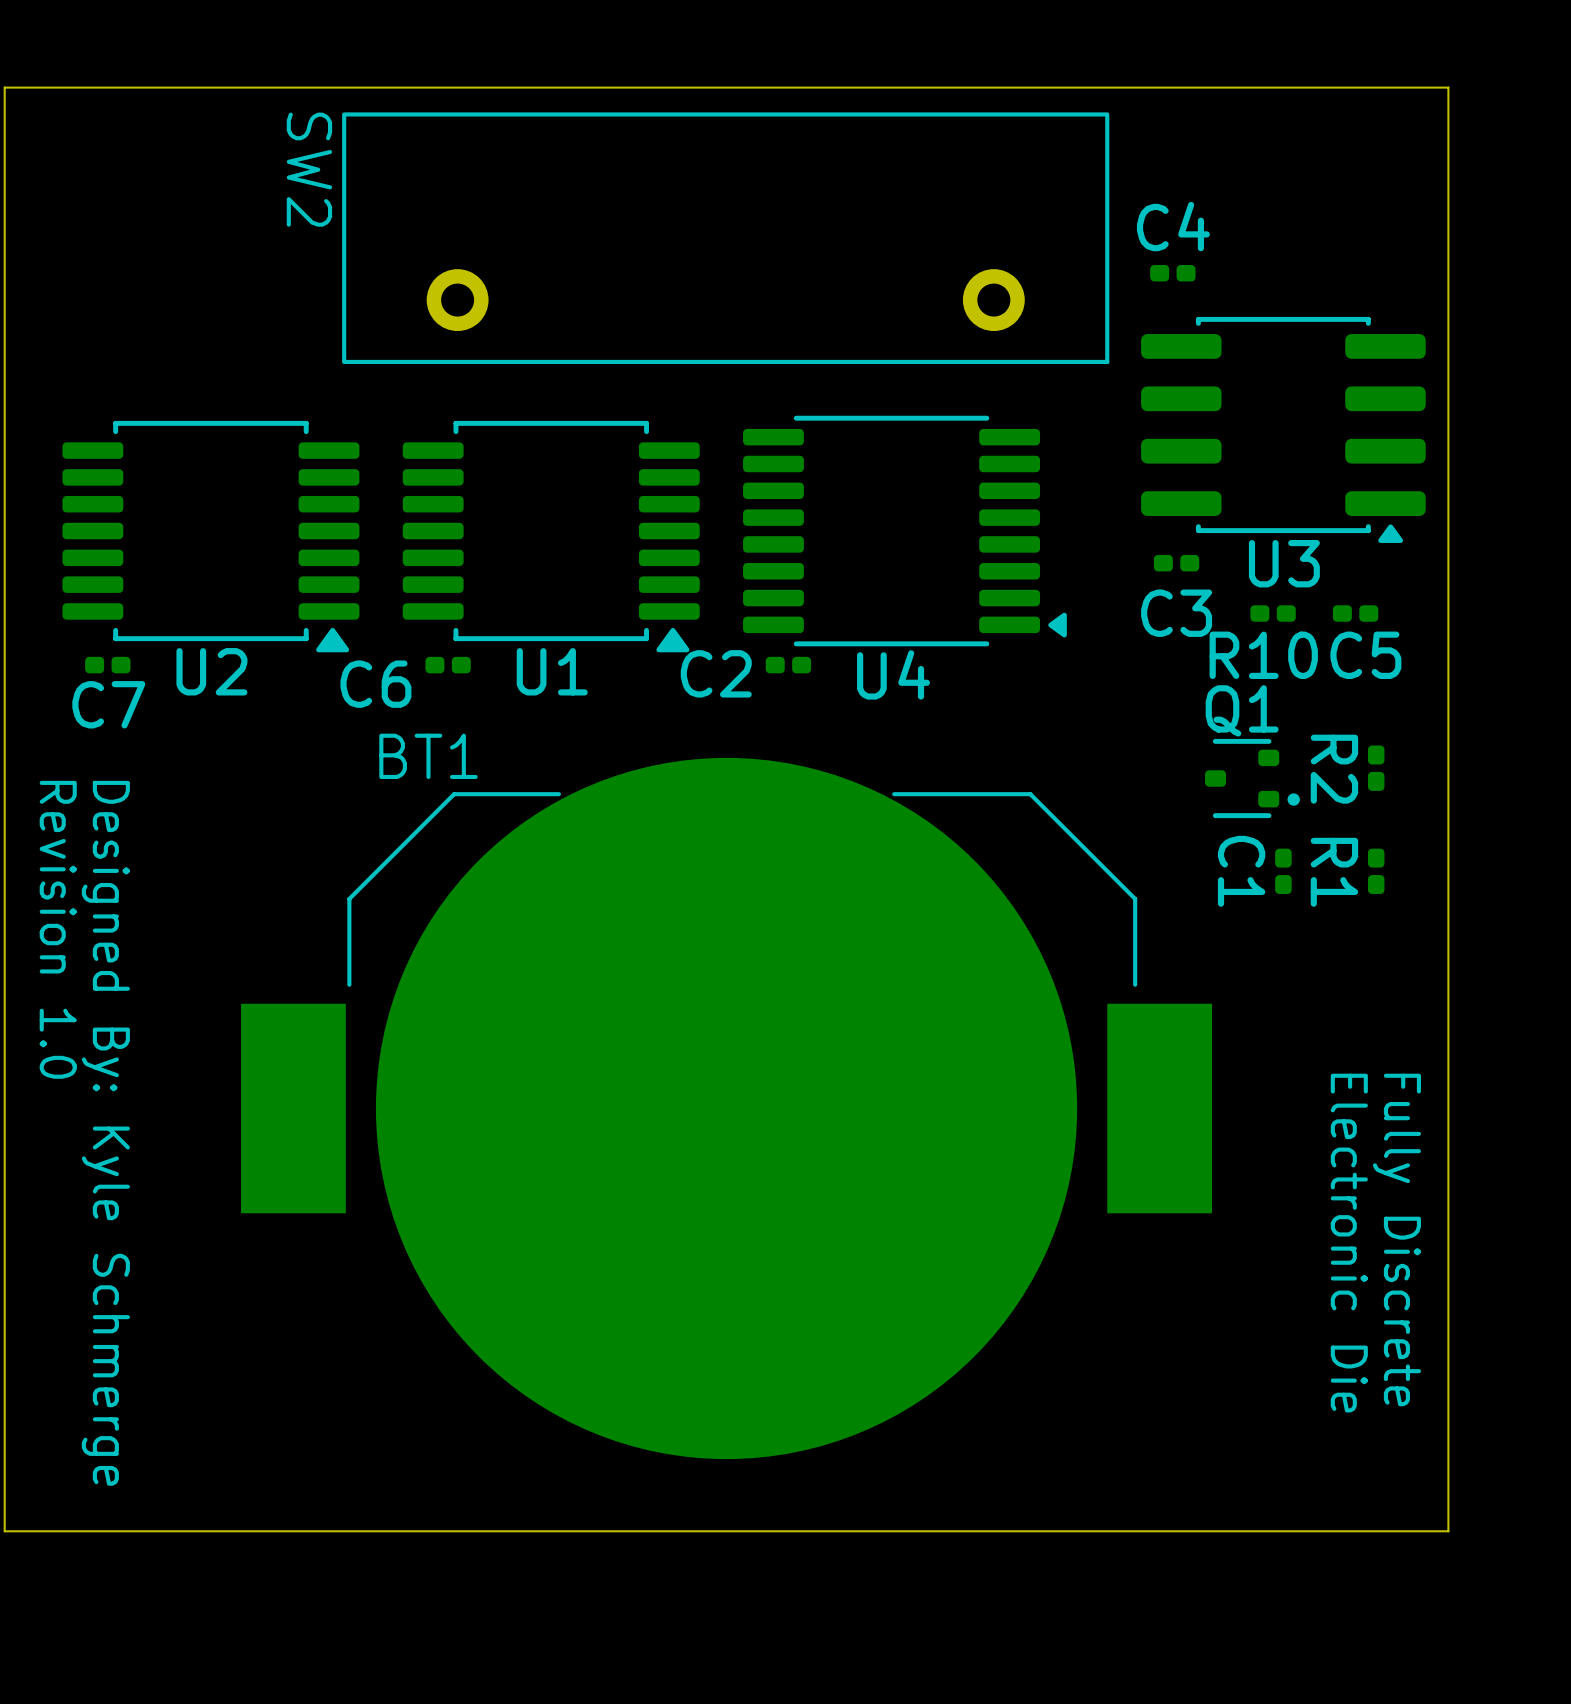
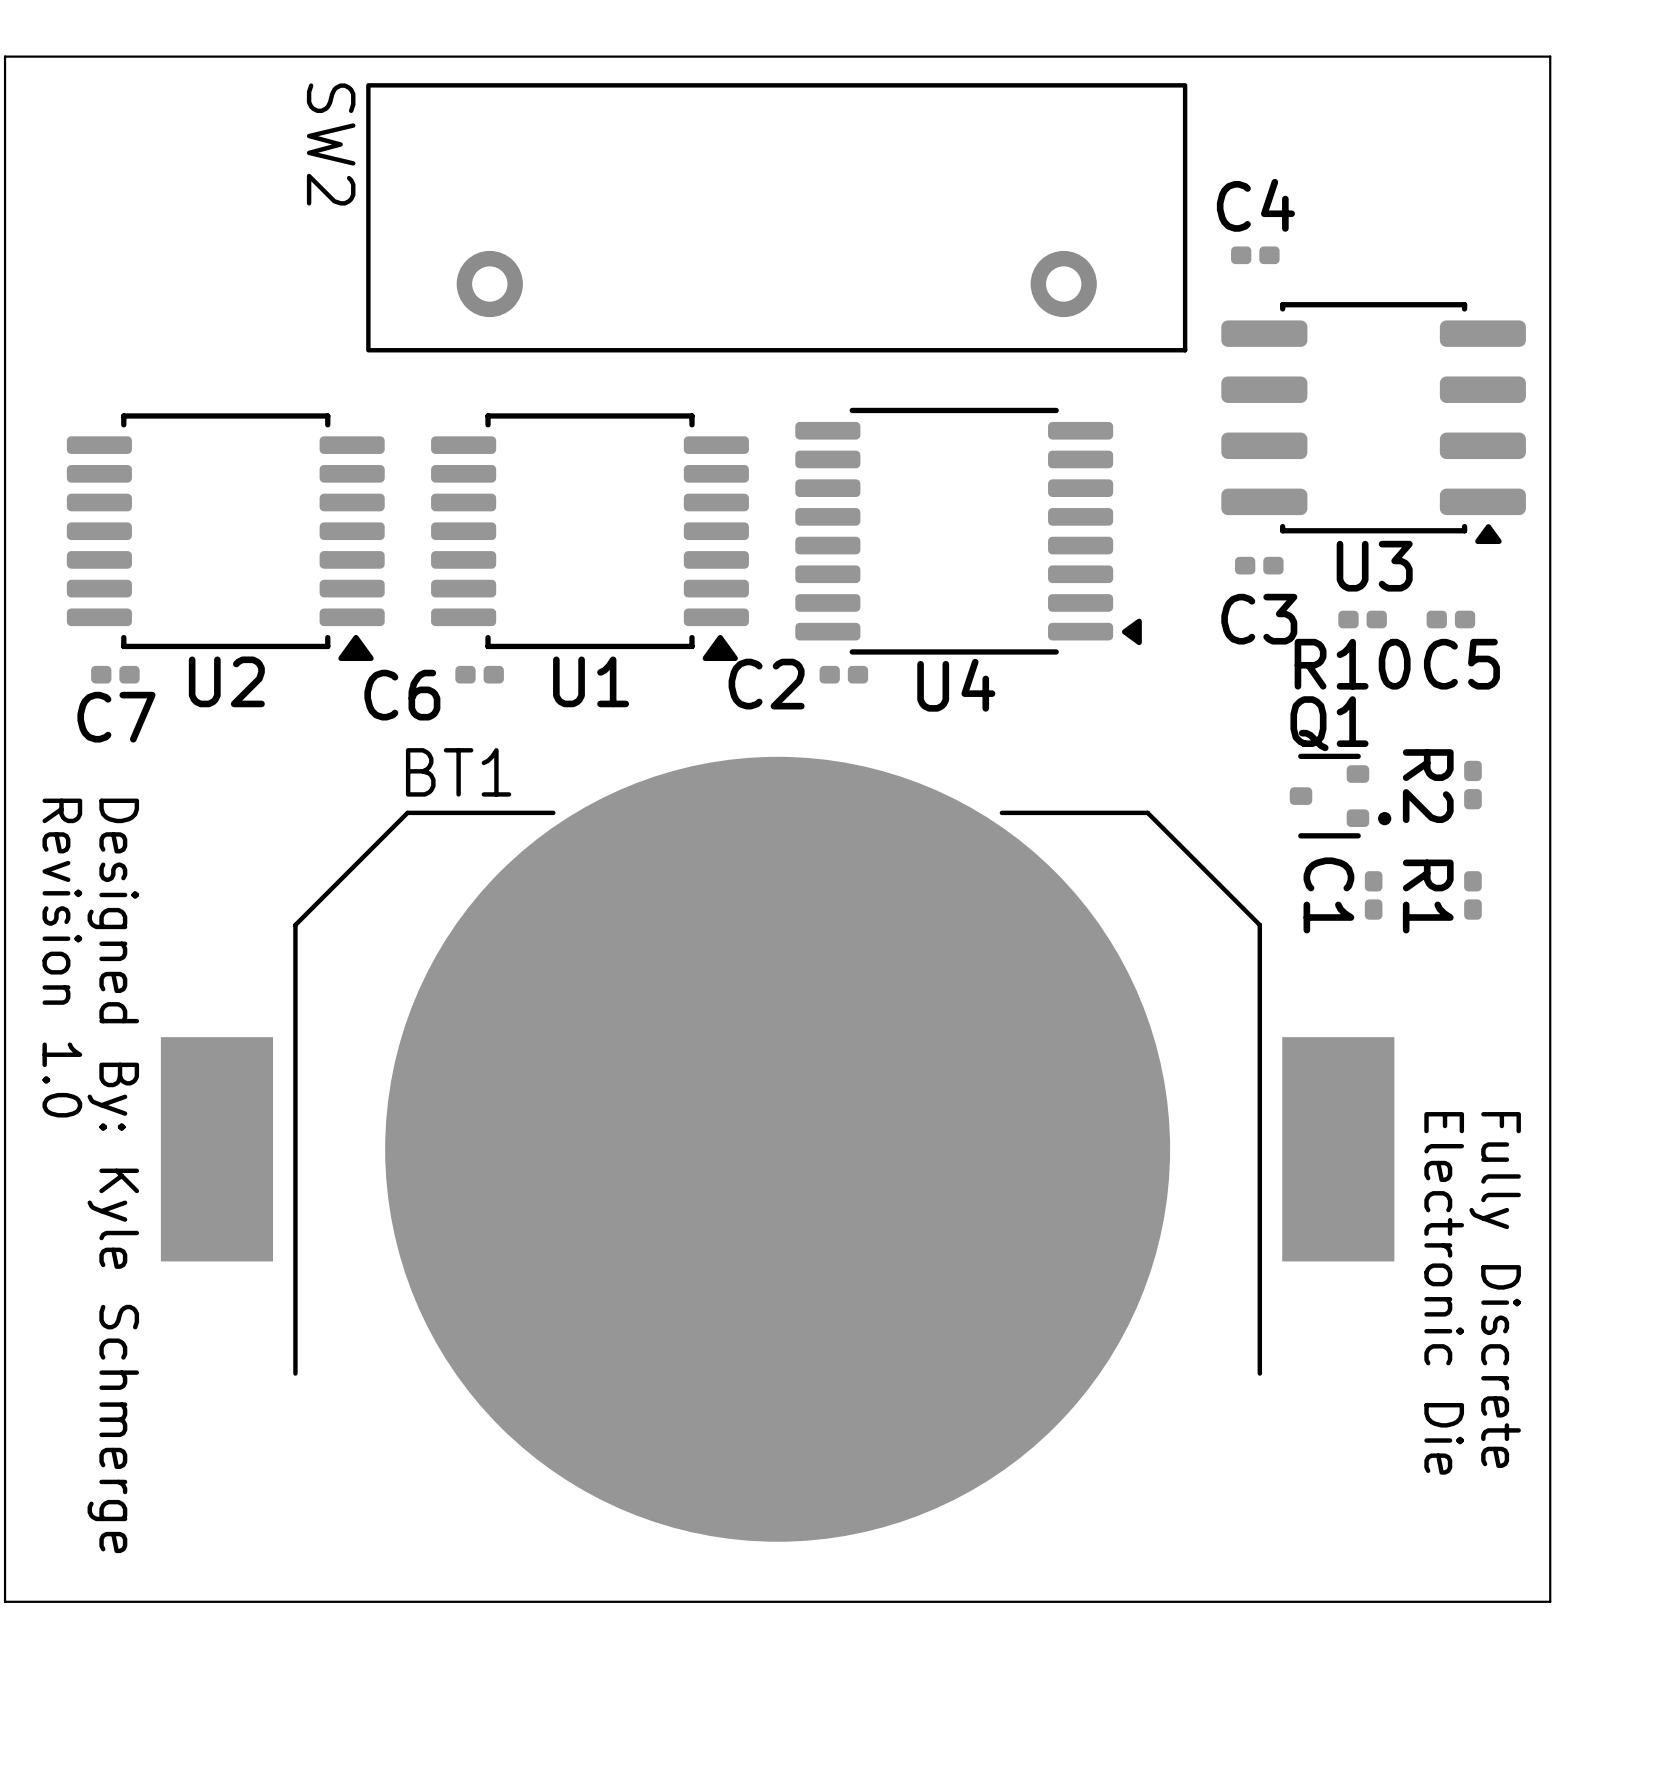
BT1 footprint: [241, 757, 1213, 1460] -> [160, 756, 1395, 1542]

